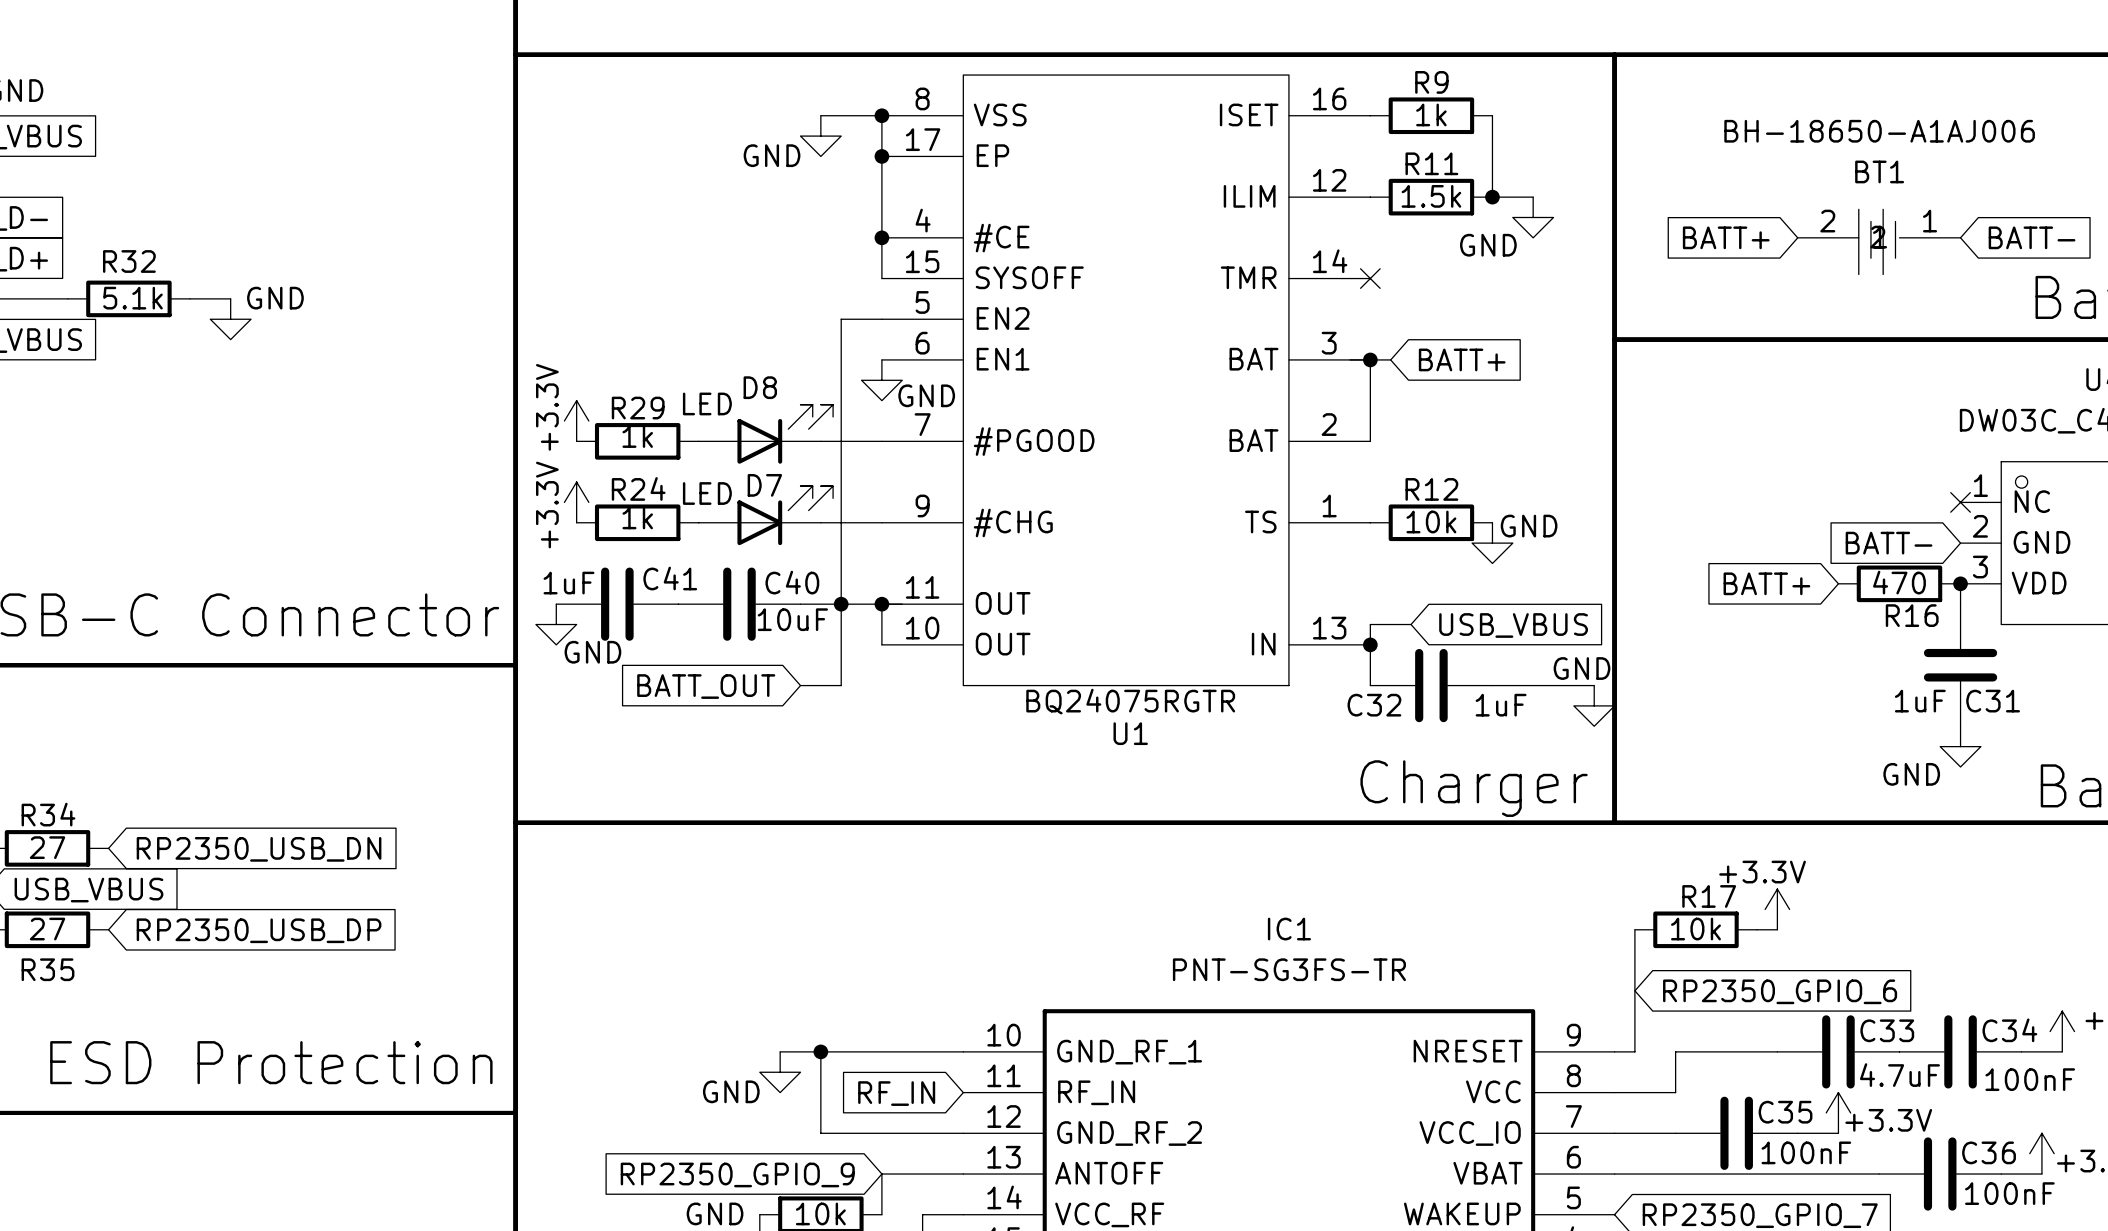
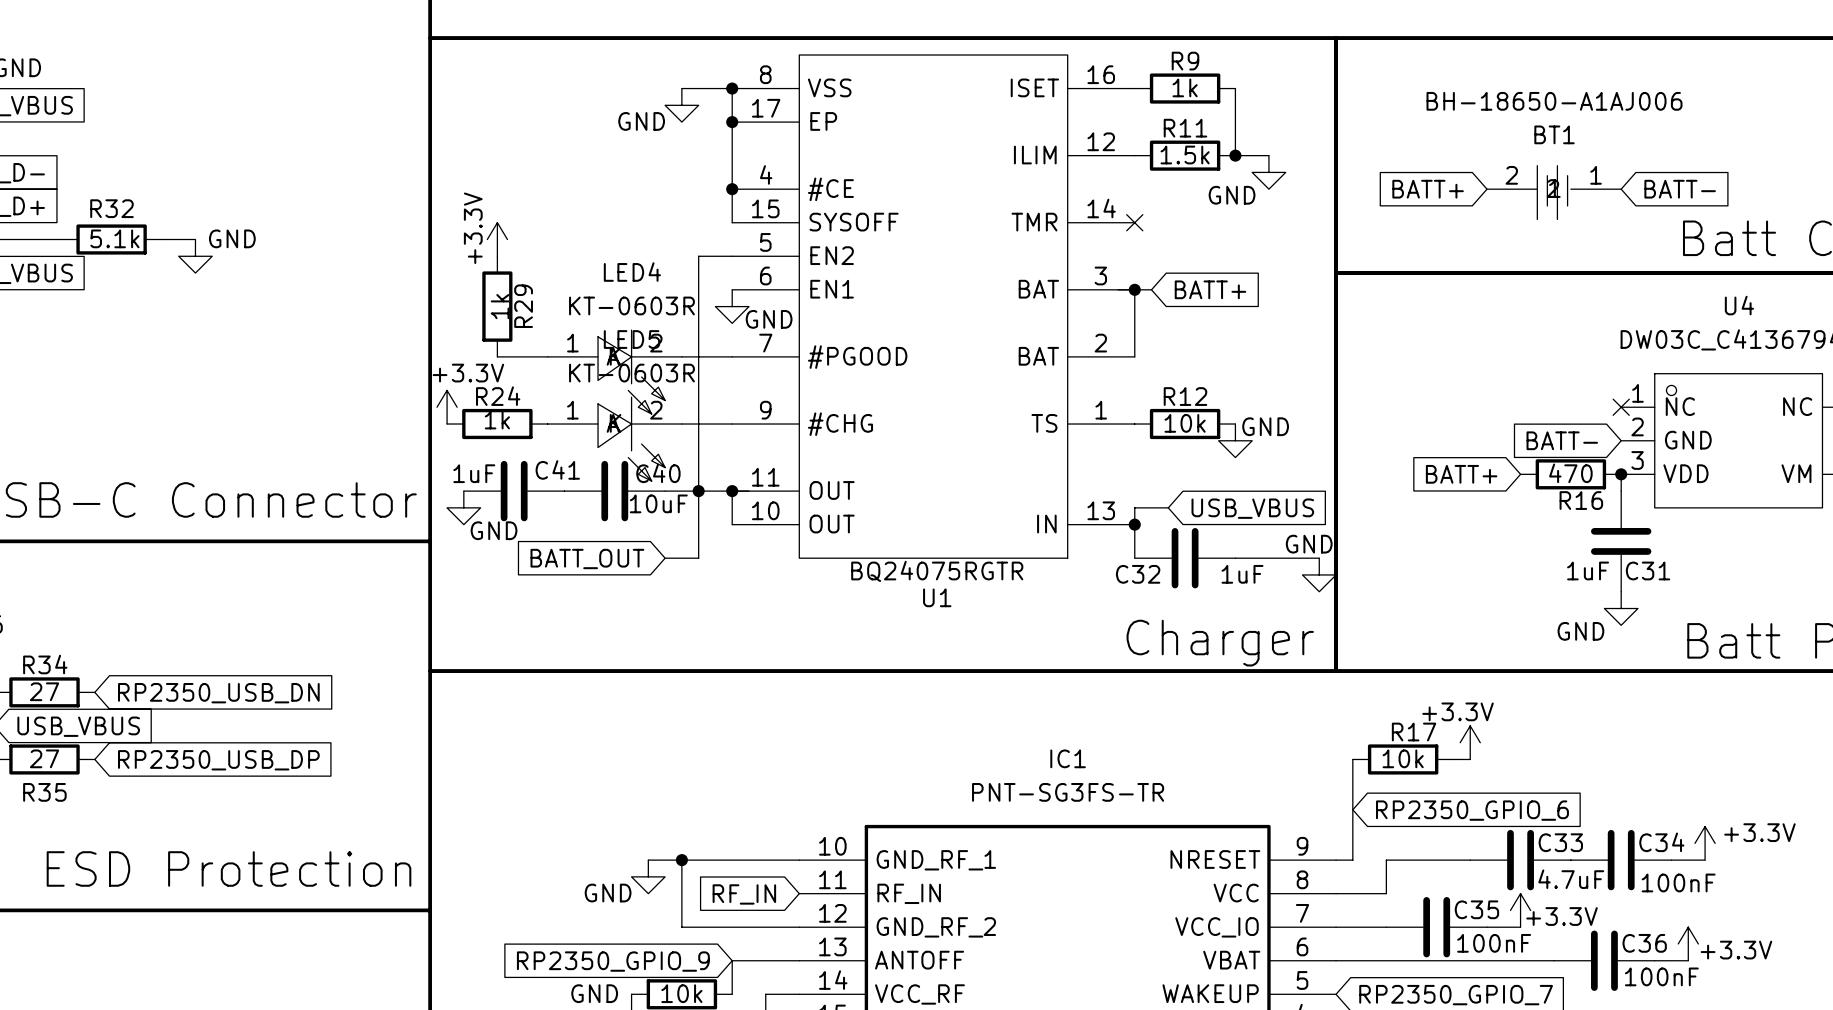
power symbol: none -> +3.3V (497, 239)
power symbol: +3.3V (576, 421) -> none
D8: LED (765, 434) -> none
wire: none -> (497, 356) (547, 356)
R29 rotation: 0° (637, 441) -> 90° clockwise (497, 306)
R29 position: (637, 441) -> (497, 306)
LED4: none -> KT-0603R (614, 372)
power symbol position: +3.3V (576, 502) -> +3.3V (447, 407)
power symbol text rotation: 0° (547, 505) -> 90° clockwise (468, 373)
D7: LED (765, 515) -> none
R24 position: (637, 522) -> (497, 424)
LED5: none -> KT-0603R (614, 439)

